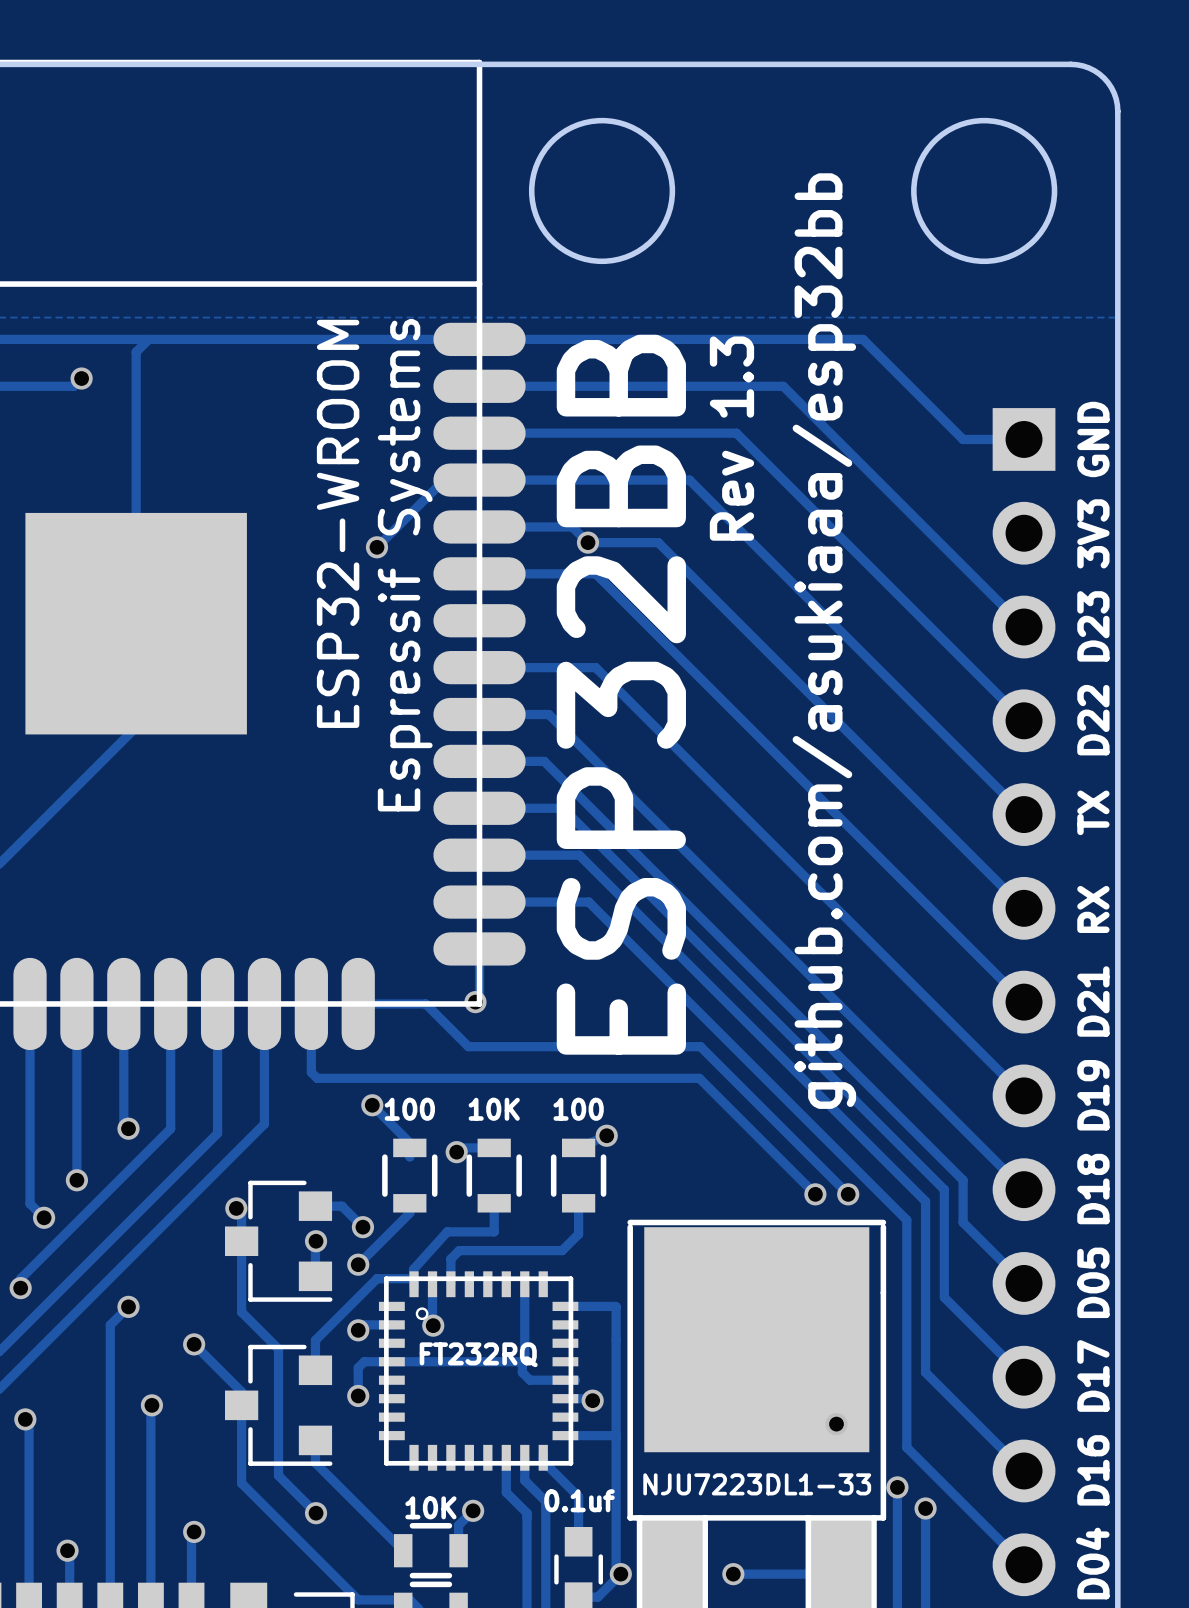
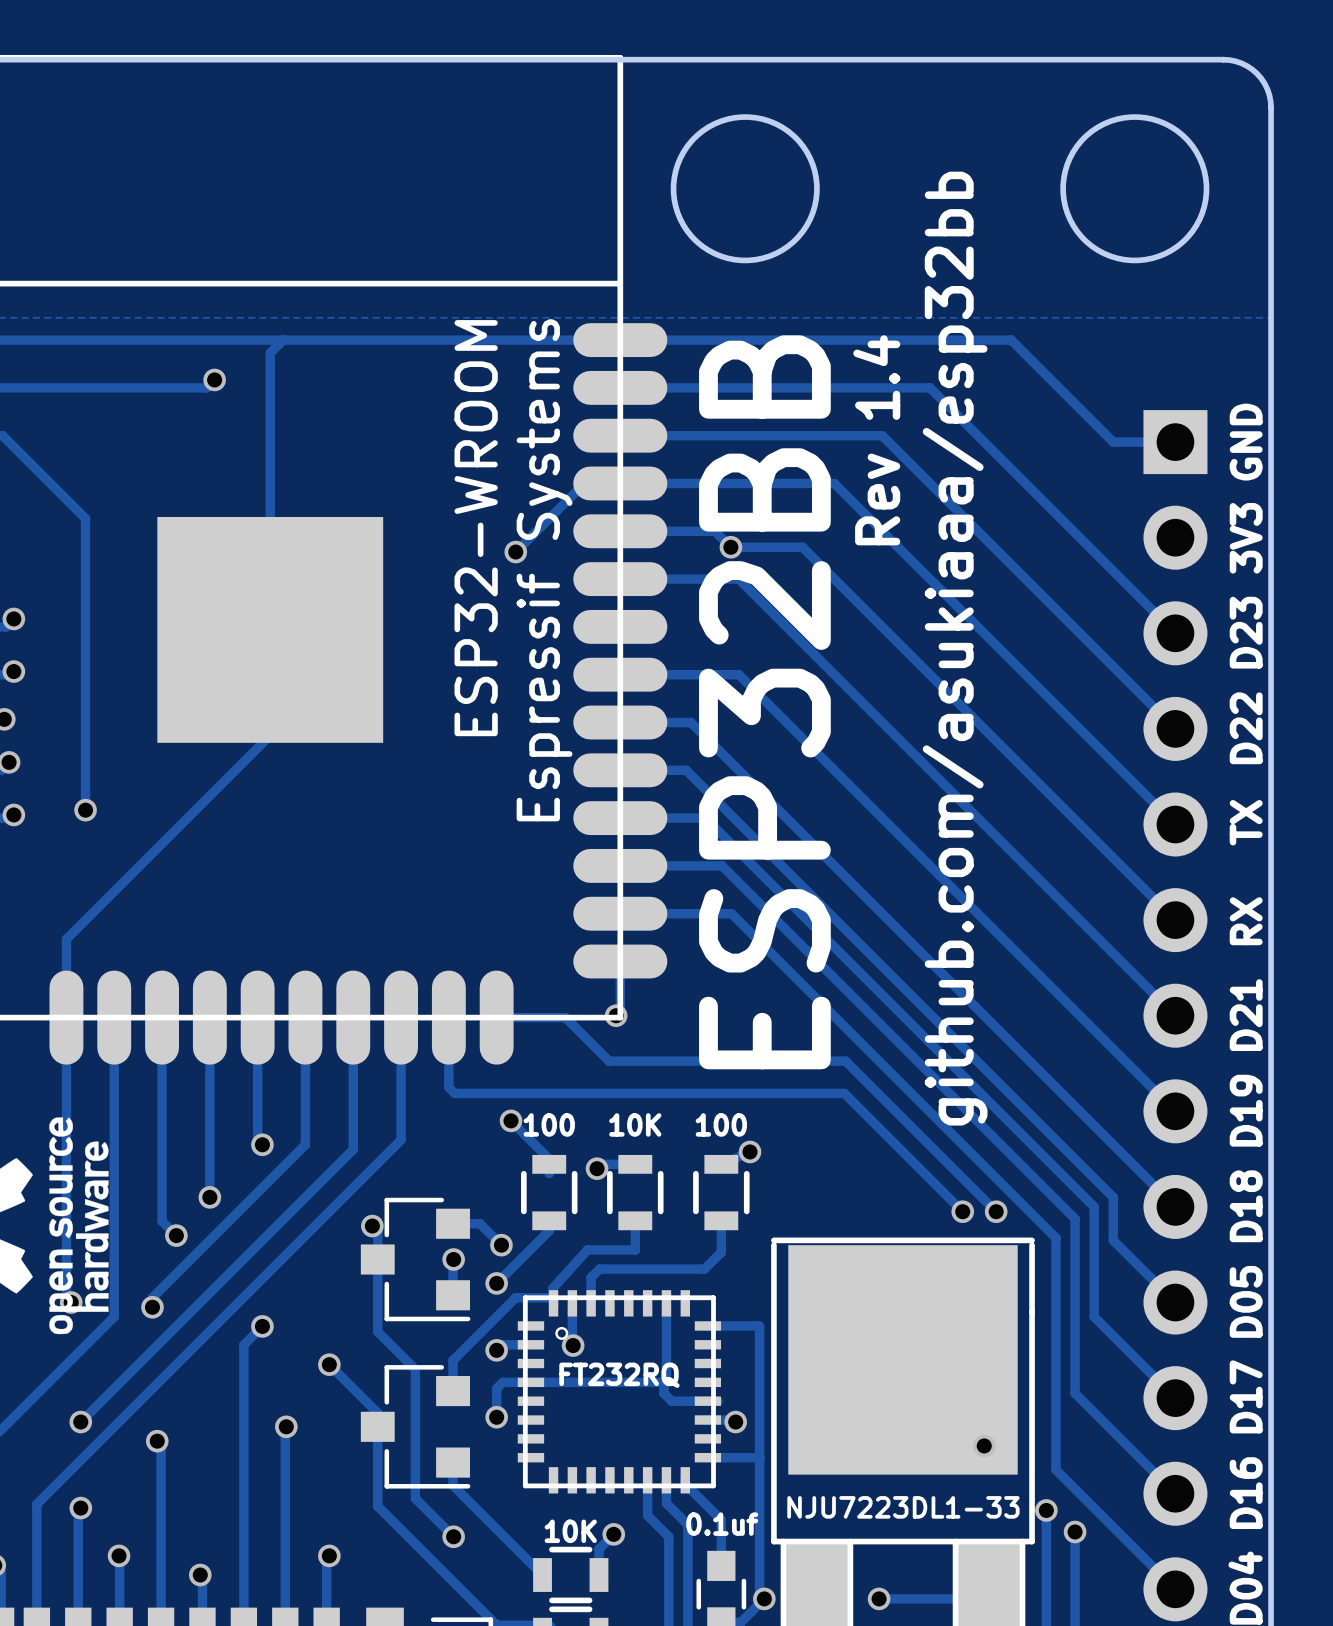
text: Rev 1.3 (731, 438) -> Rev 1.4 (876, 440)
text position: github.com/asukiaaa/esp32bb (824, 641) -> github.com/asukiaaa/esp32bb (955, 648)

